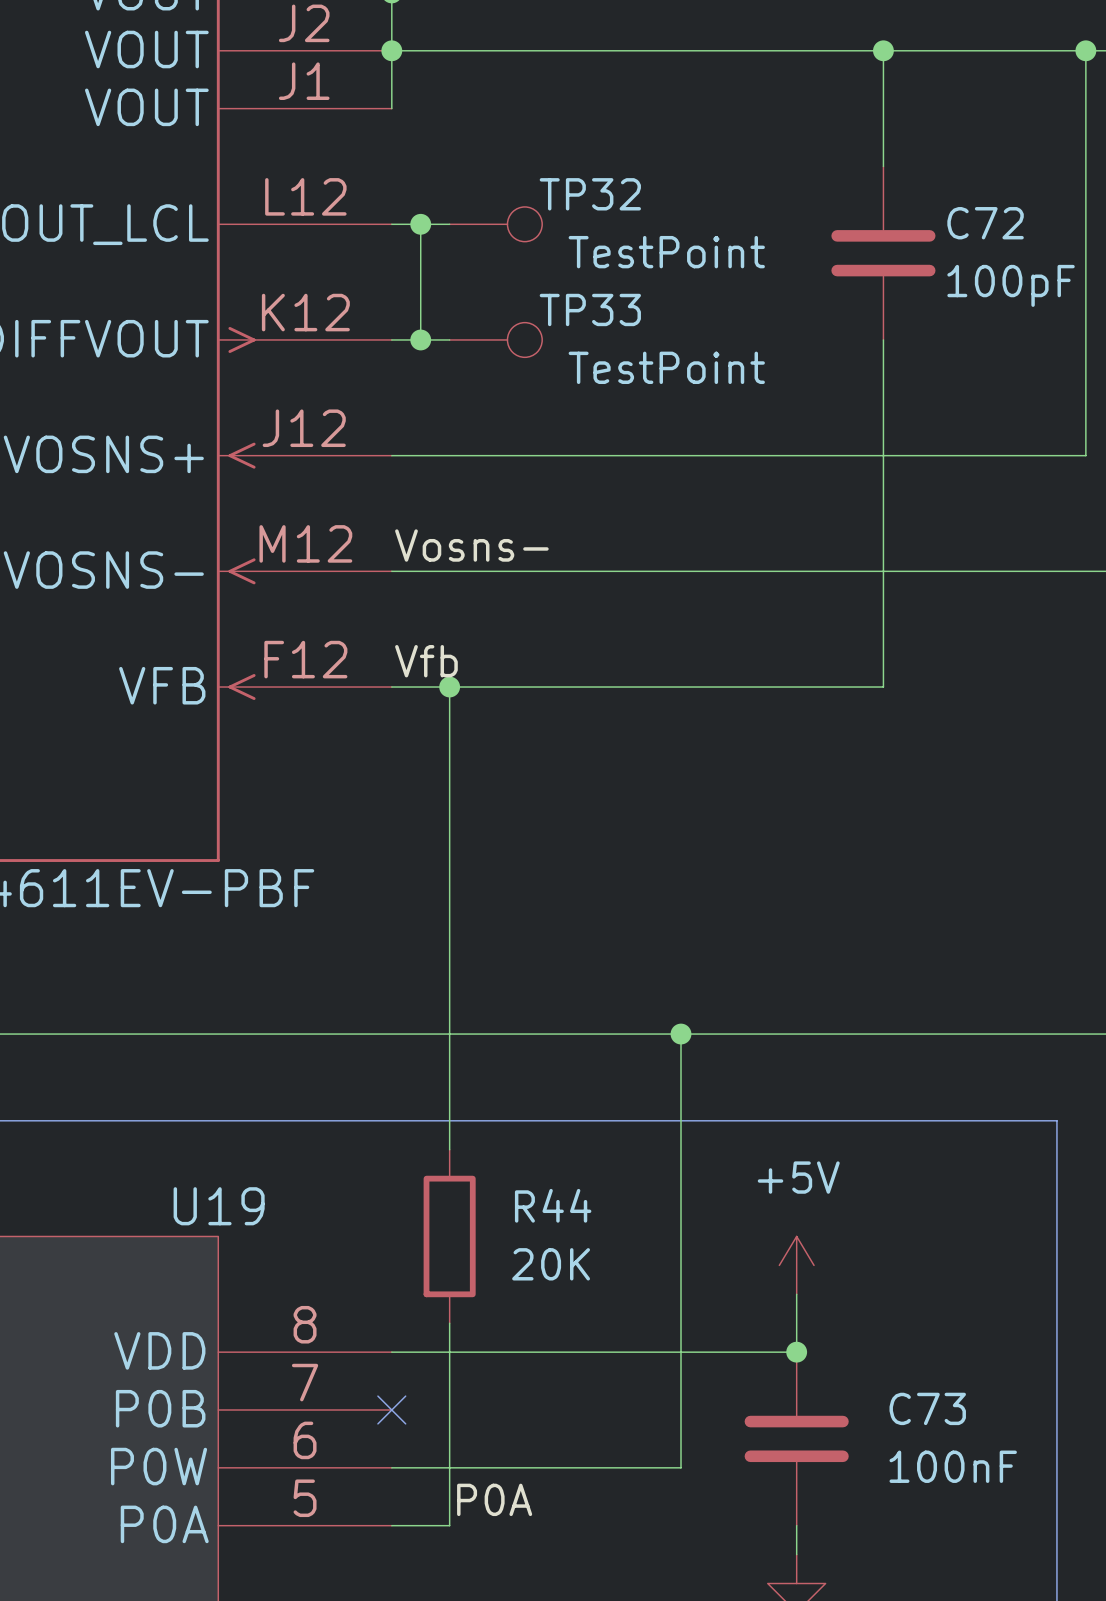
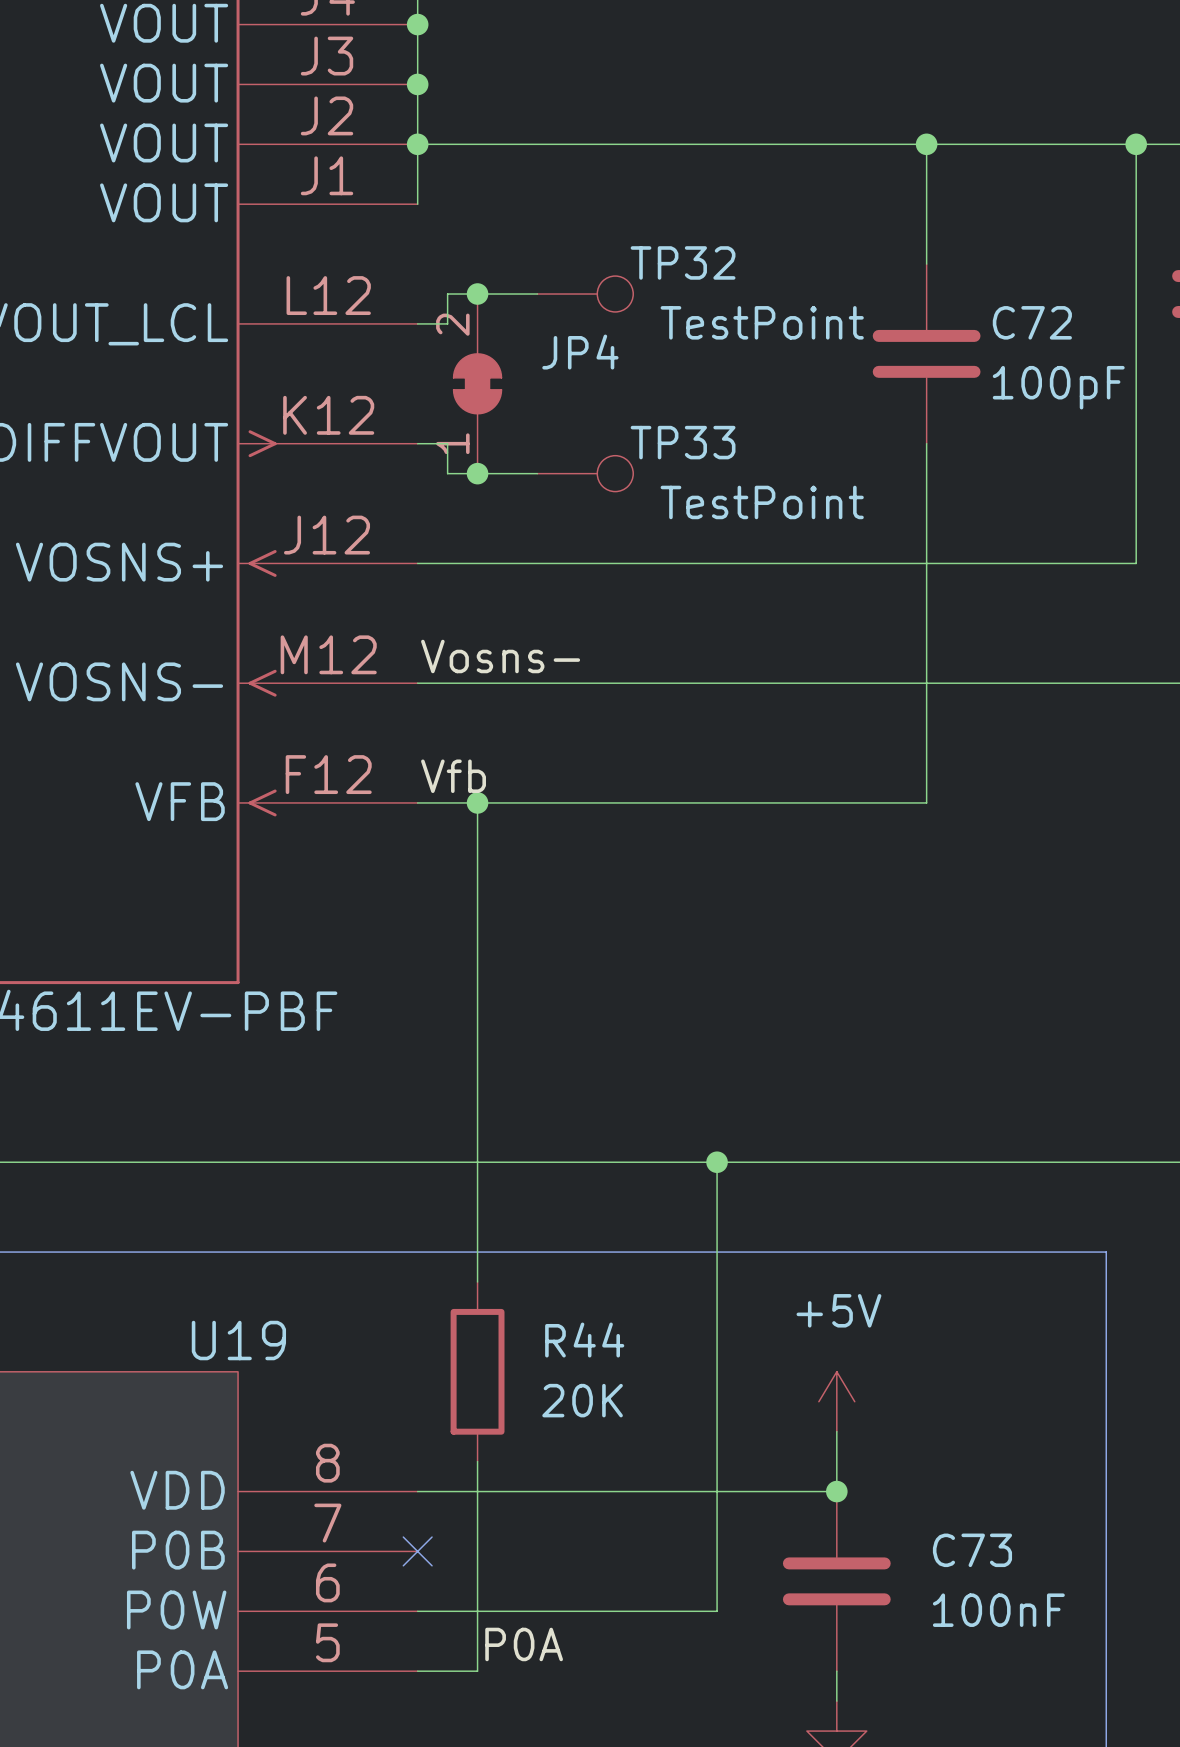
wire: none -> (537, 294) (447, 294) (447, 323)
junction position: (420, 224) -> (477, 294)
wire: (449, 224) (420, 224) (420, 339) (449, 339) -> none
TP32 position: (495, 224) -> (585, 294)
JP4: none -> (477, 383)
wire: none -> (447, 443) (447, 473) (537, 473)
junction position: (420, 339) -> (477, 473)
TP33 position: (495, 339) -> (585, 473)

